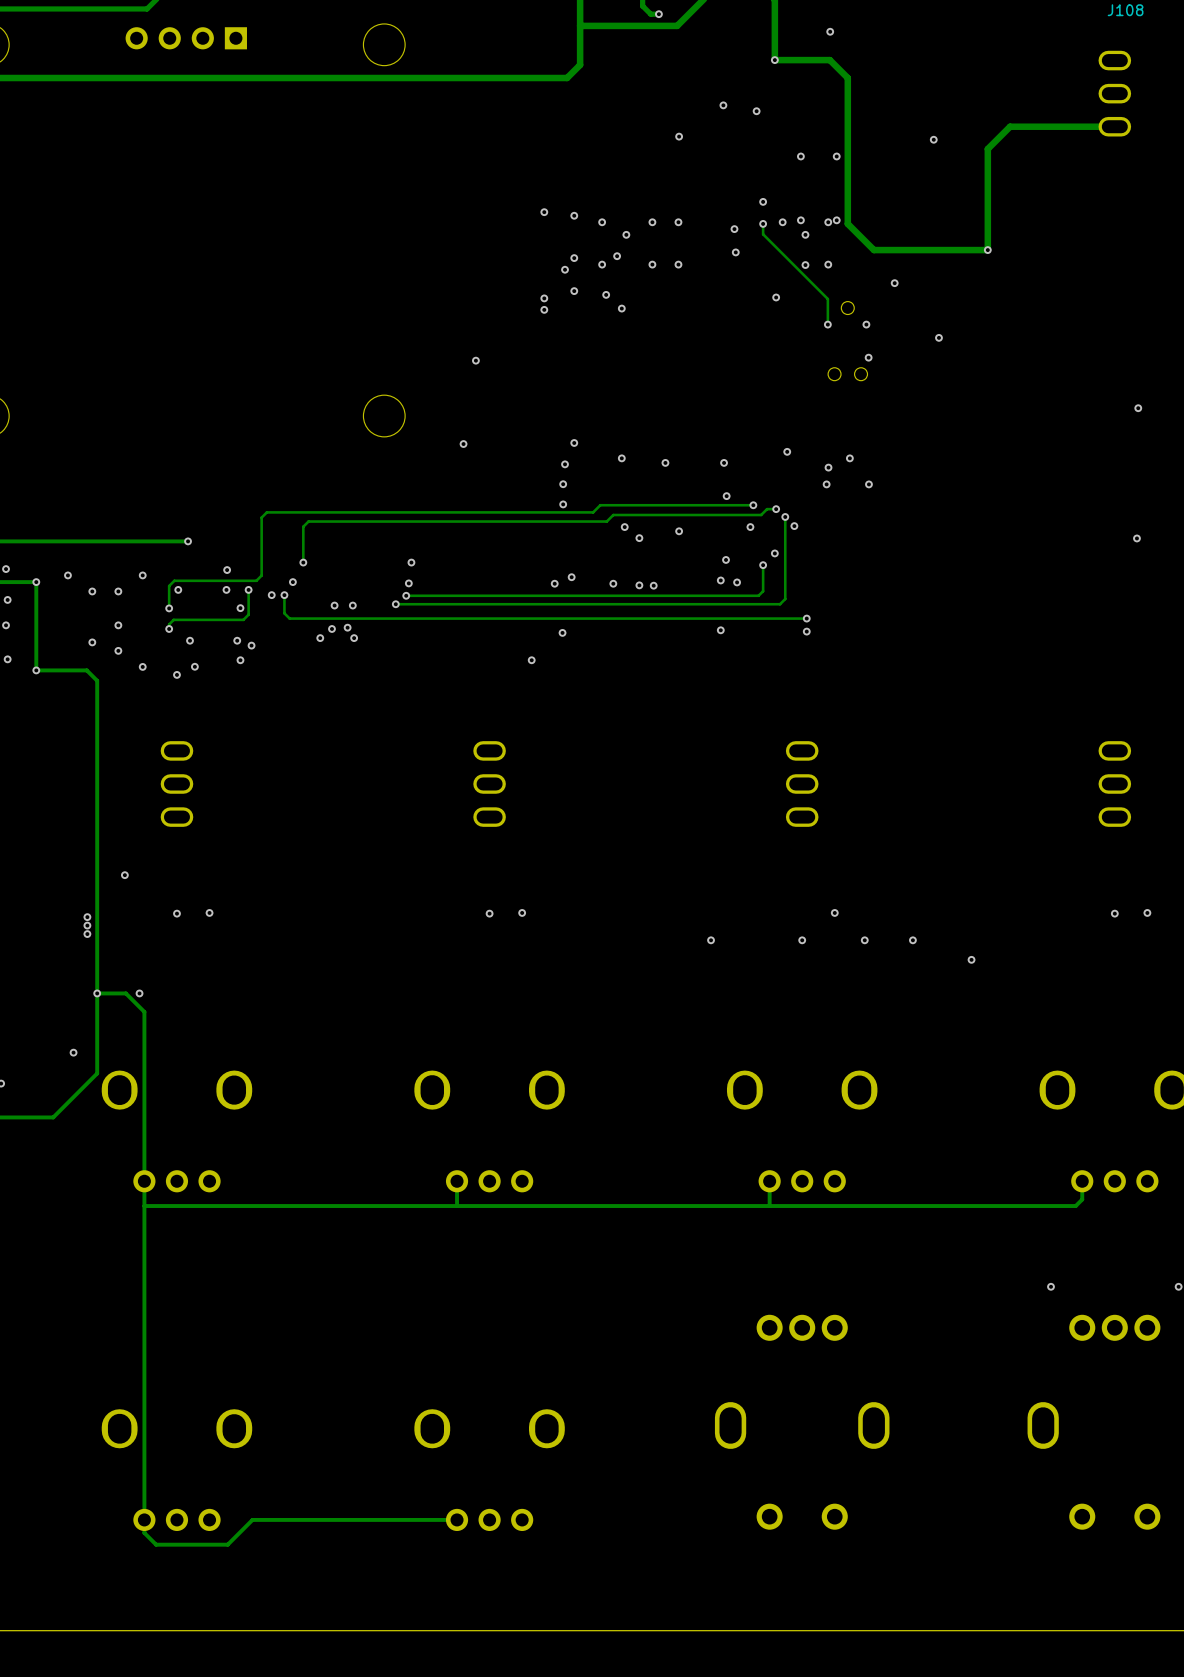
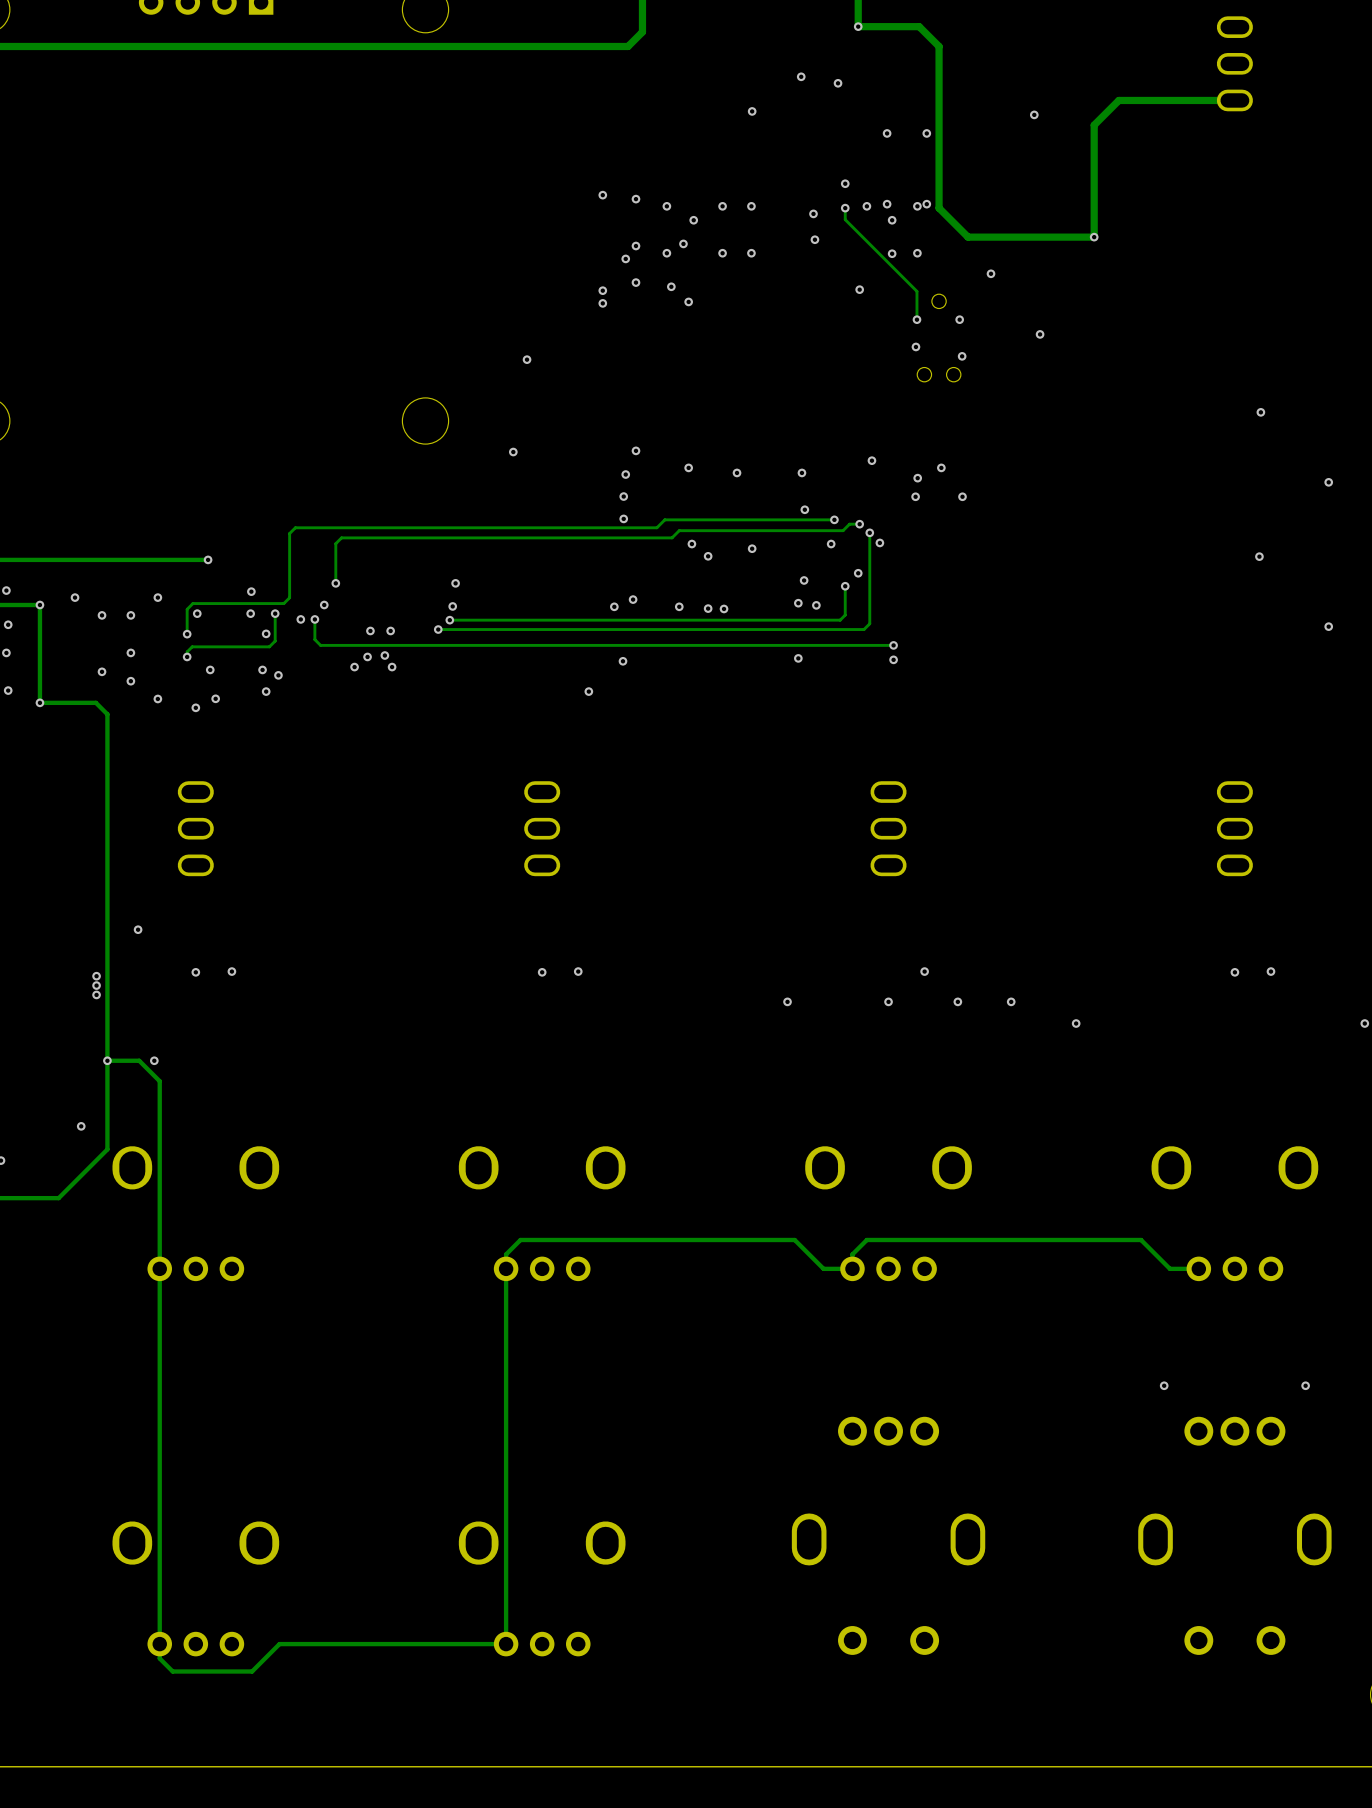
via: none -> (915, 346)
track: (769, 1181) (769, 1206) -> none
track: (1082, 1181) (1082, 1199) (1075, 1206) (144, 1206) -> (1198, 1268) (1169, 1268) (1141, 1239) (866, 1239) (852, 1254) (852, 1268) (823, 1268) (794, 1239) (520, 1239) (506, 1254) (506, 1268)
track: none -> (506, 1296) (506, 1644)

